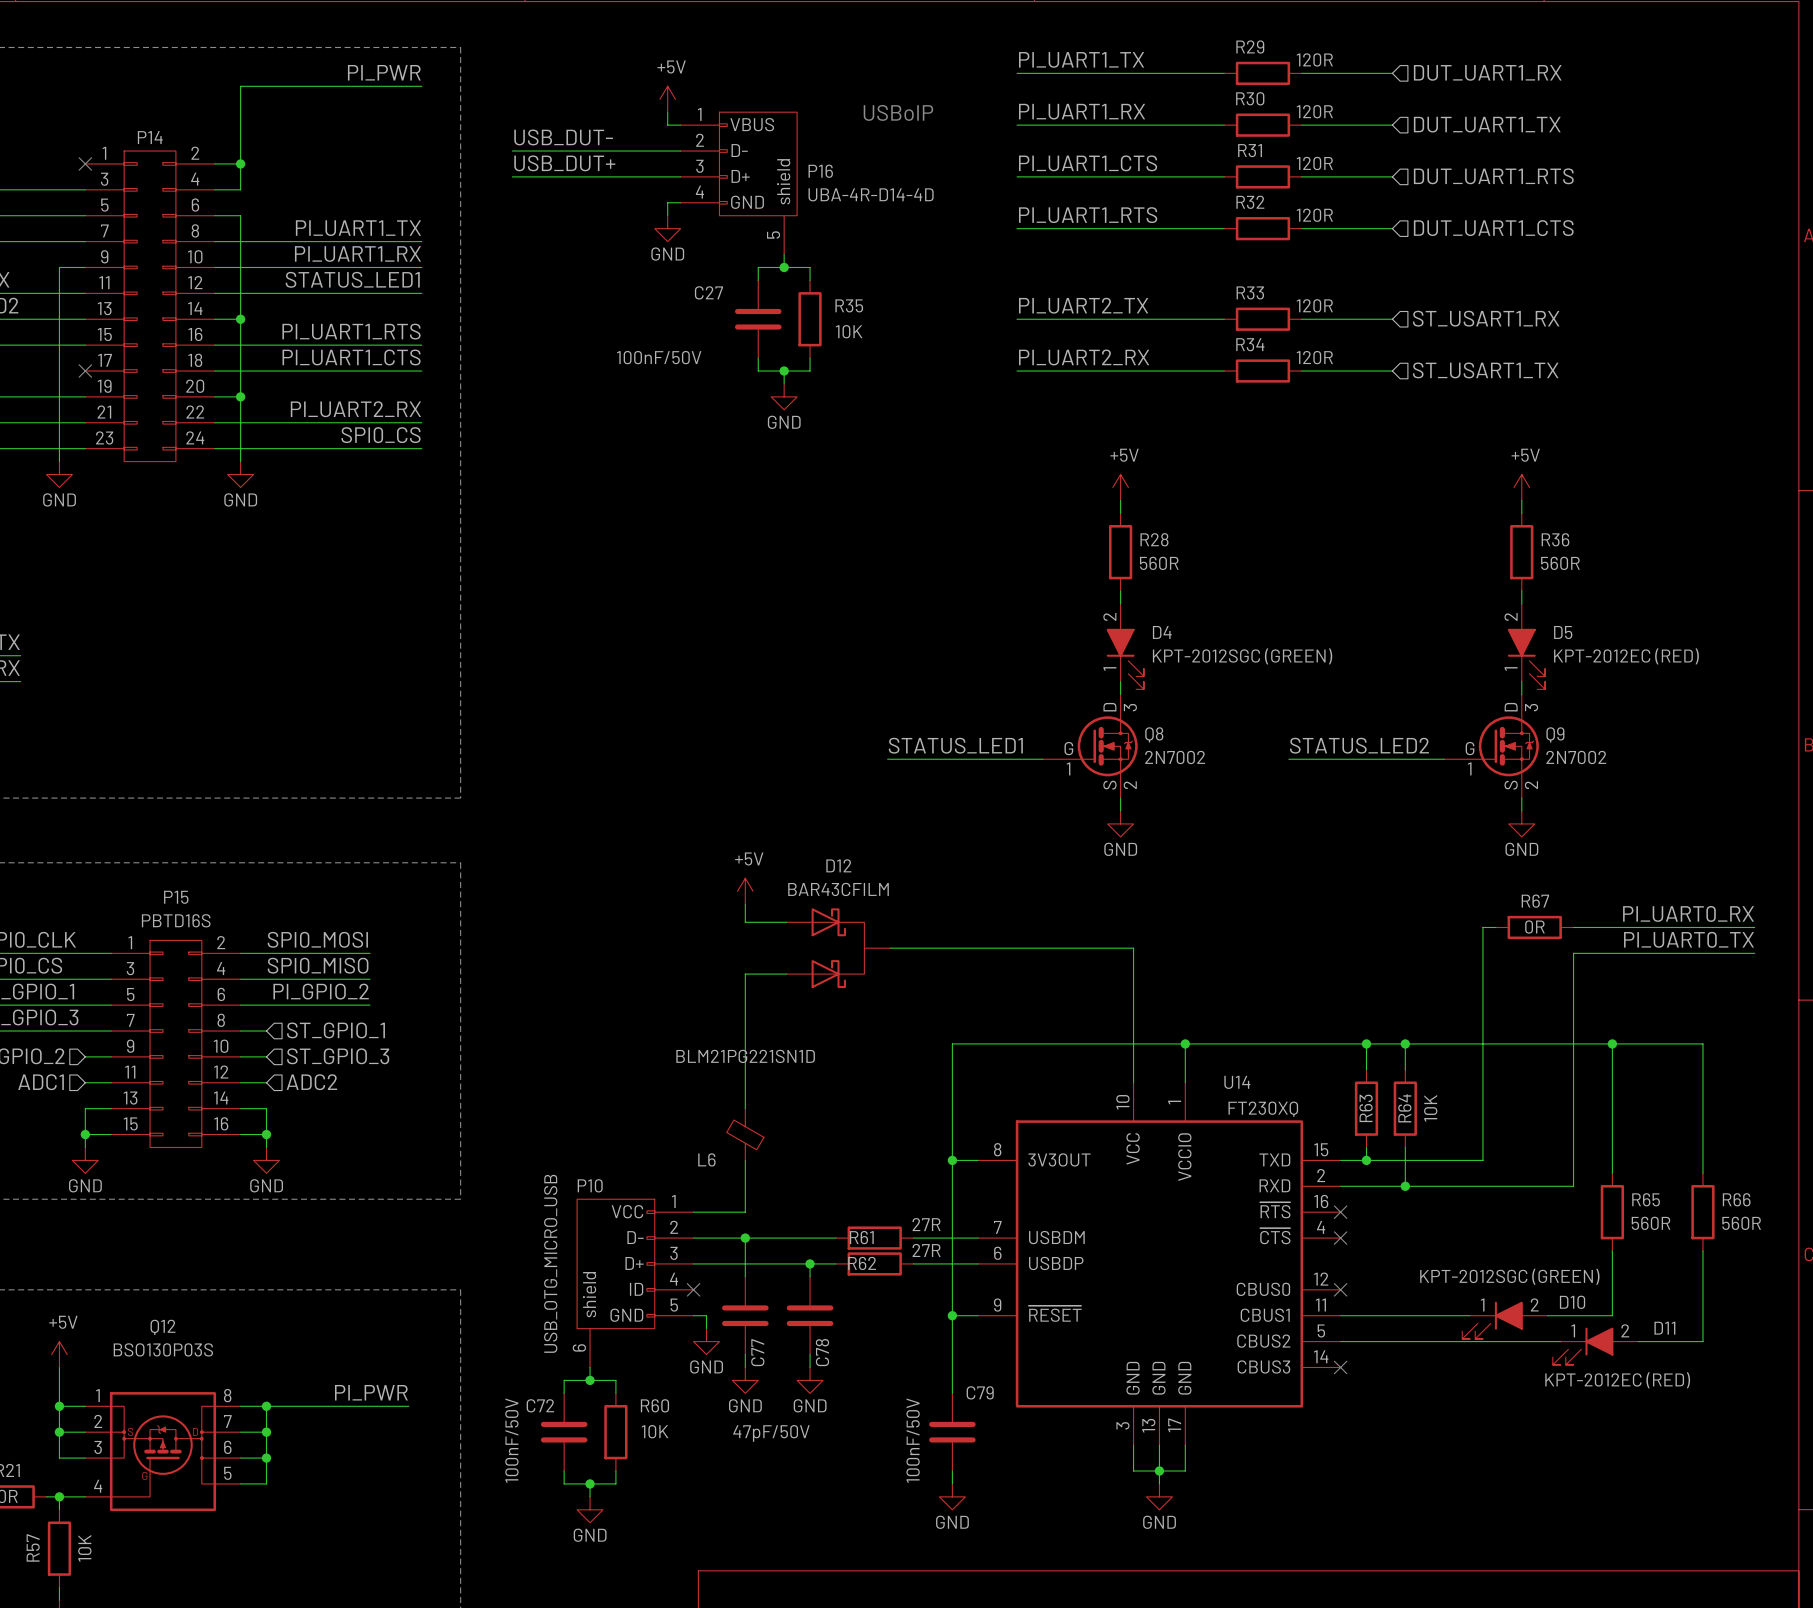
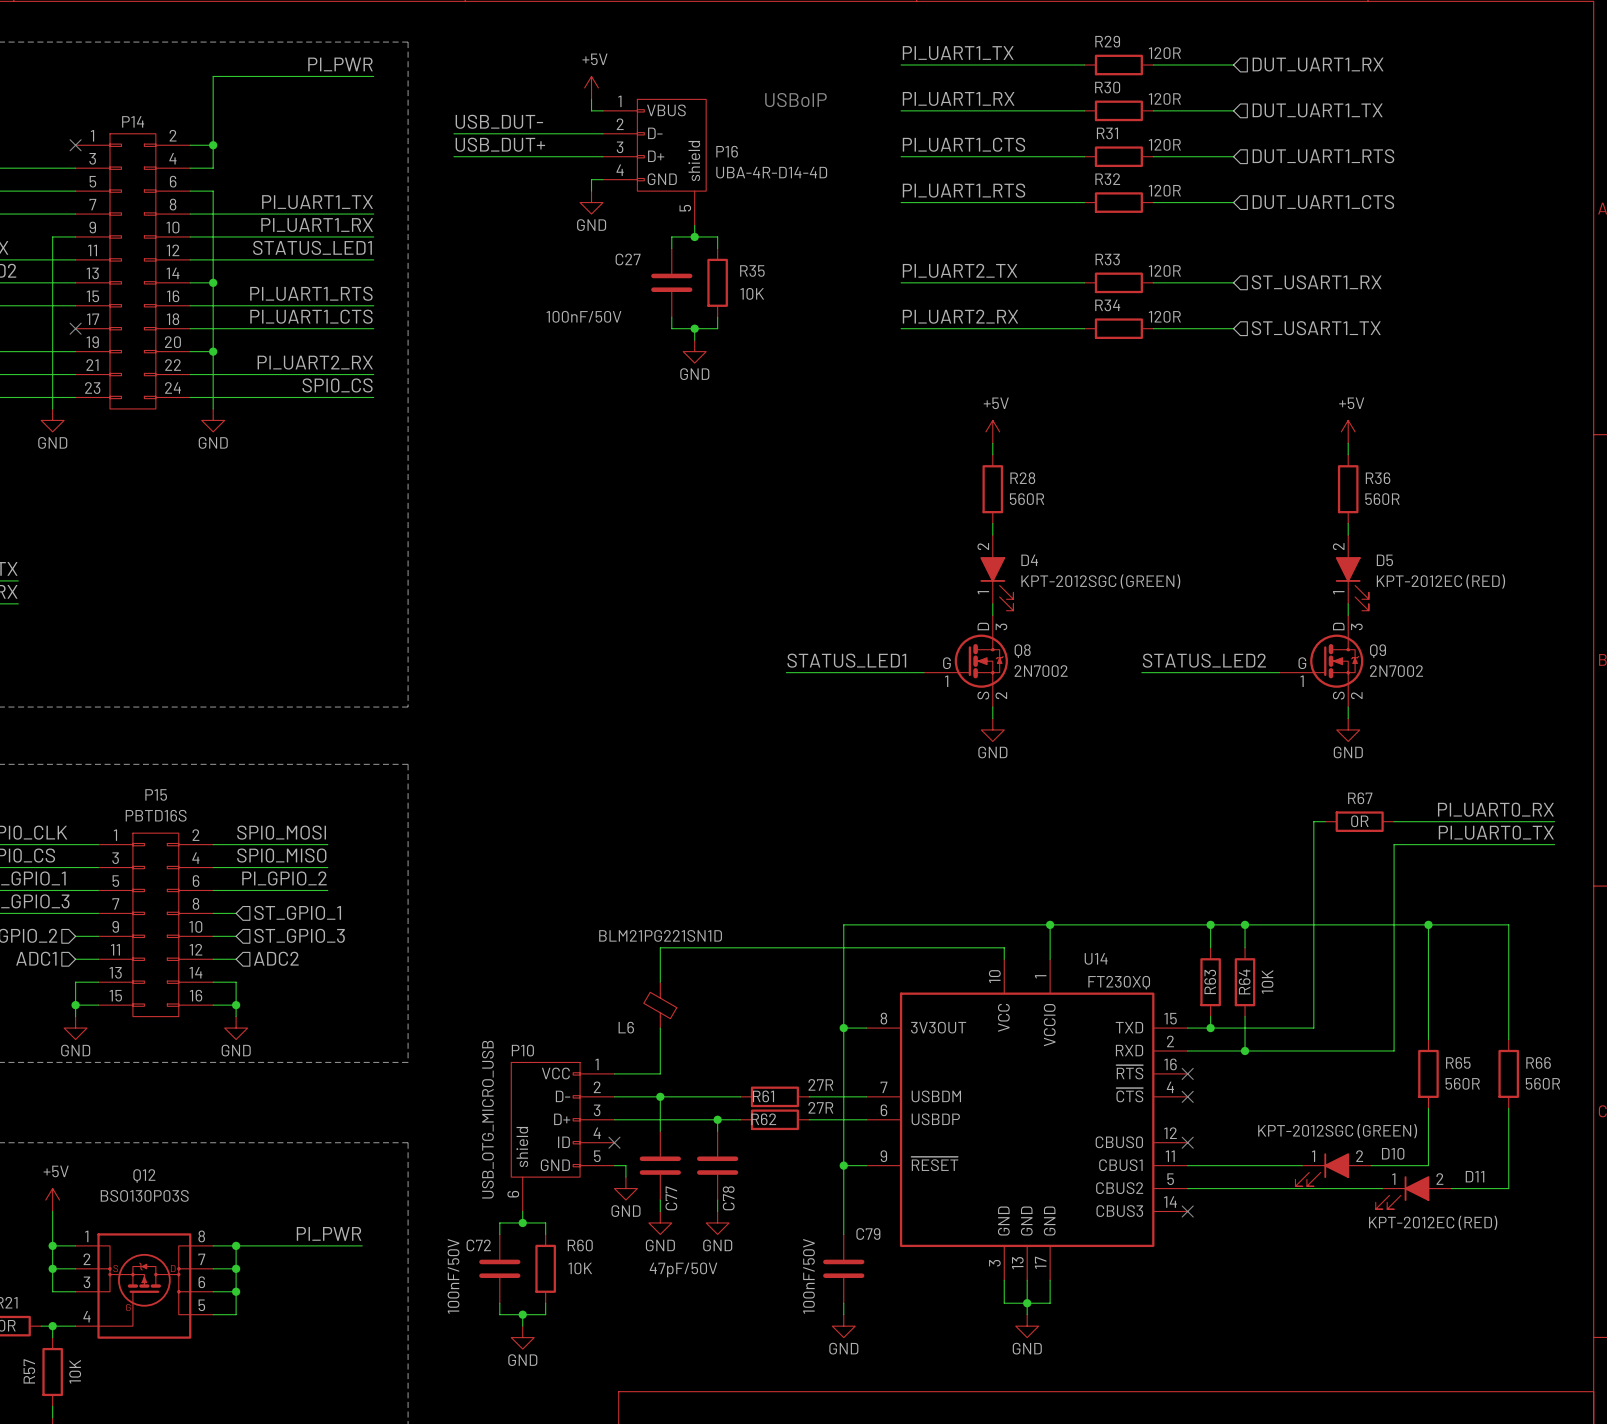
power symbol: +5V (745, 891) -> none
wire: (745, 904) (745, 922) (786, 922) -> none
D12: BAR43CFILM (838, 948) -> none
wire: (890, 948) (1133, 948) (1133, 1069) -> (660, 947) (1004, 947)
wire: (786, 974) (745, 974) (745, 1069) -> none

